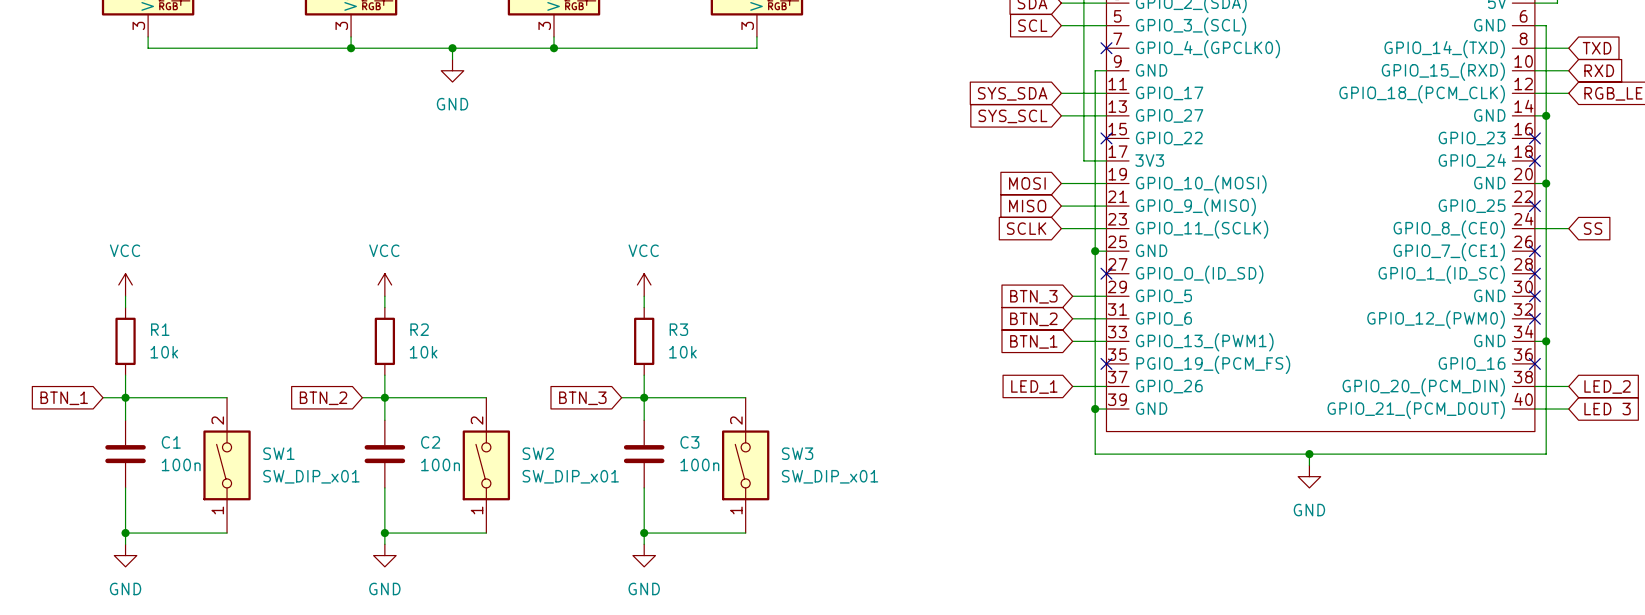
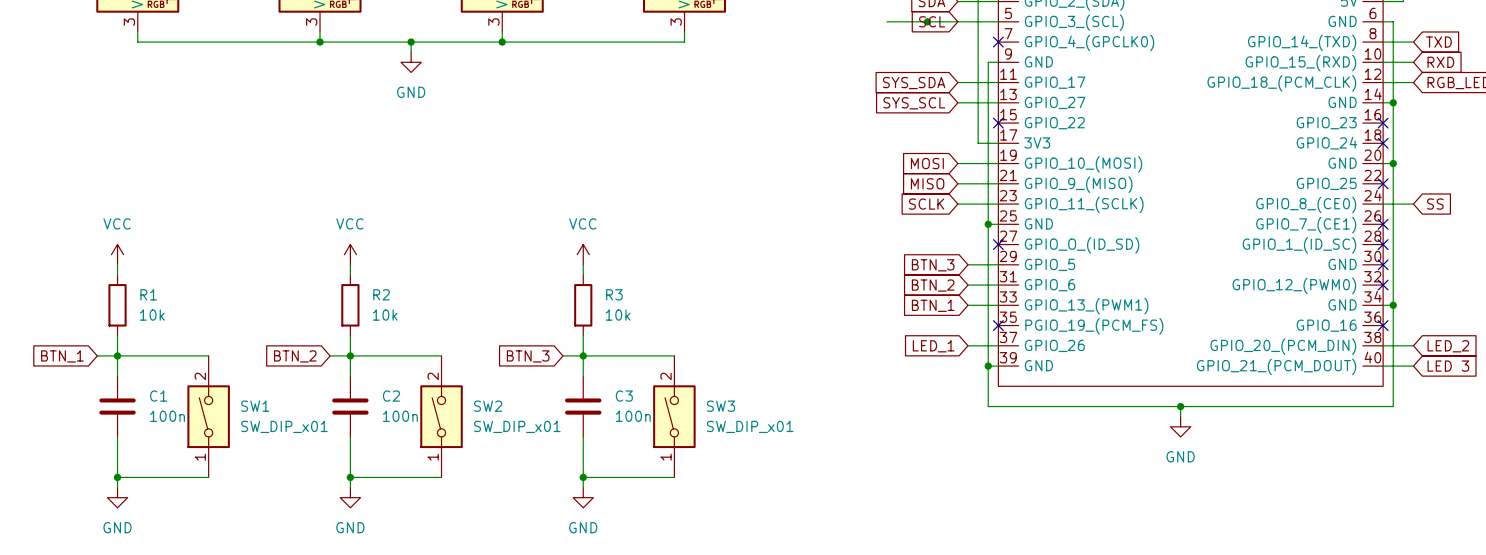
wire: none -> (887, 21) (957, 21)
junction: none -> (927, 21)

